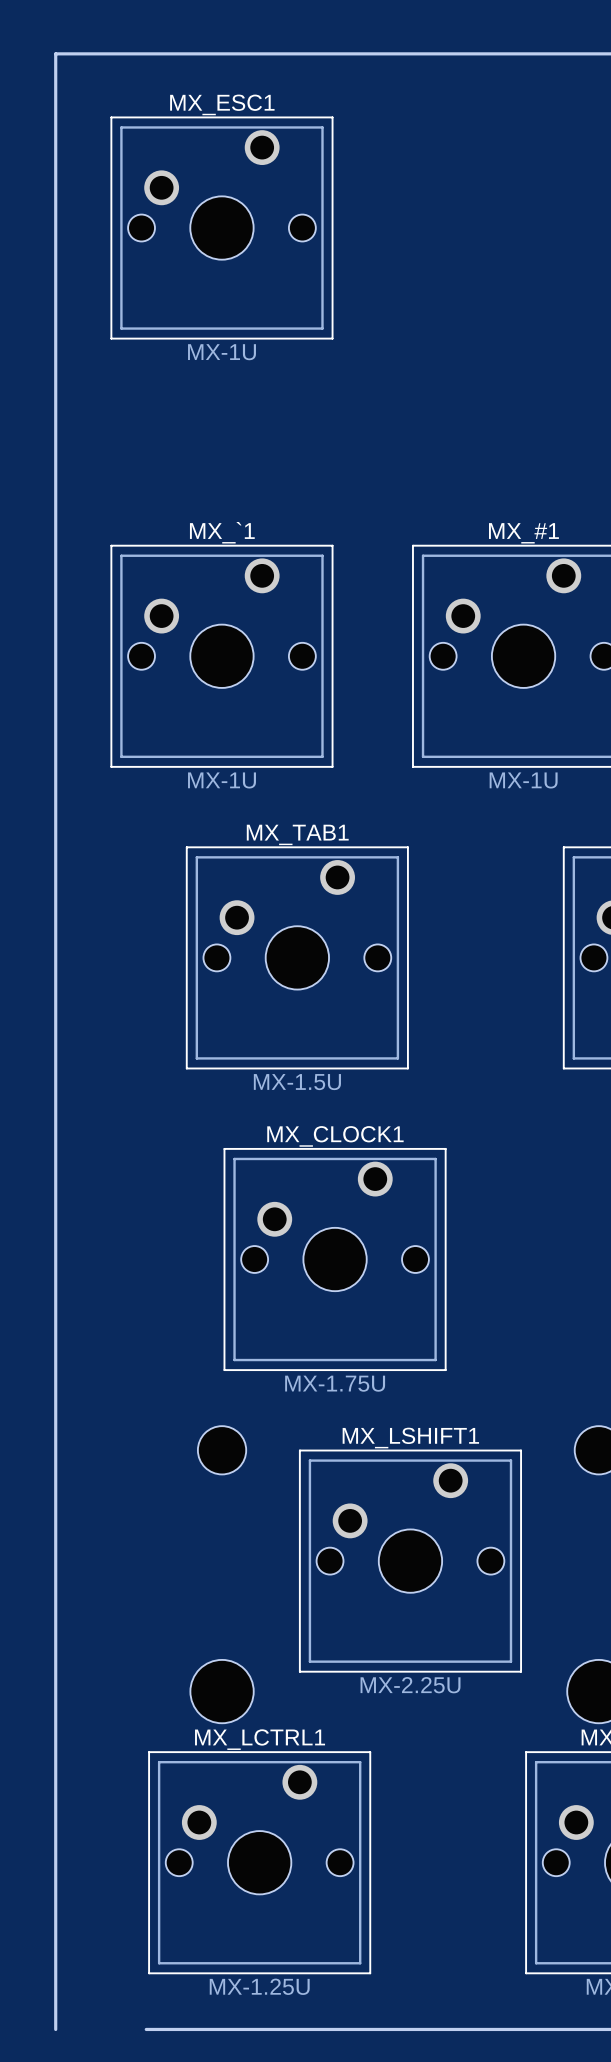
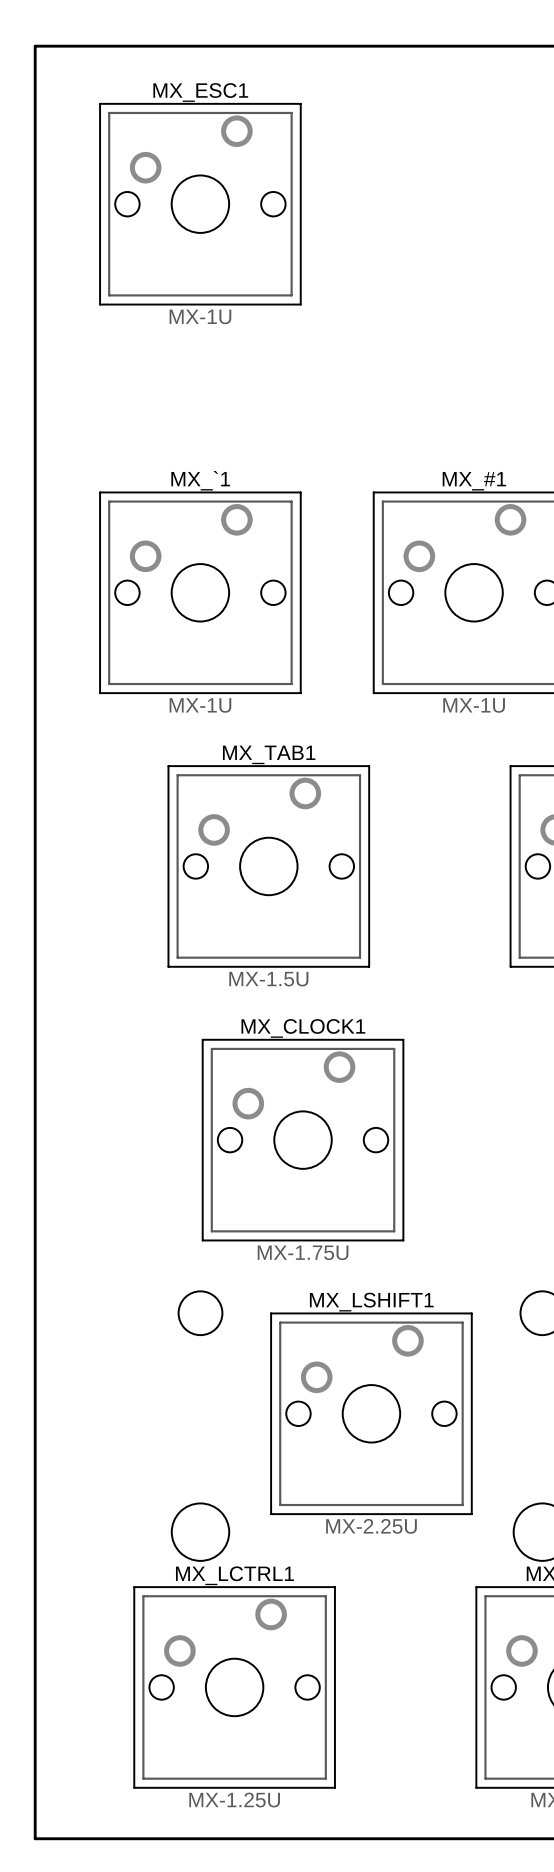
board edge: (55, 53) (55, 2029) -> (49, 46) (35, 46) (35, 1838) (131, 1838)

